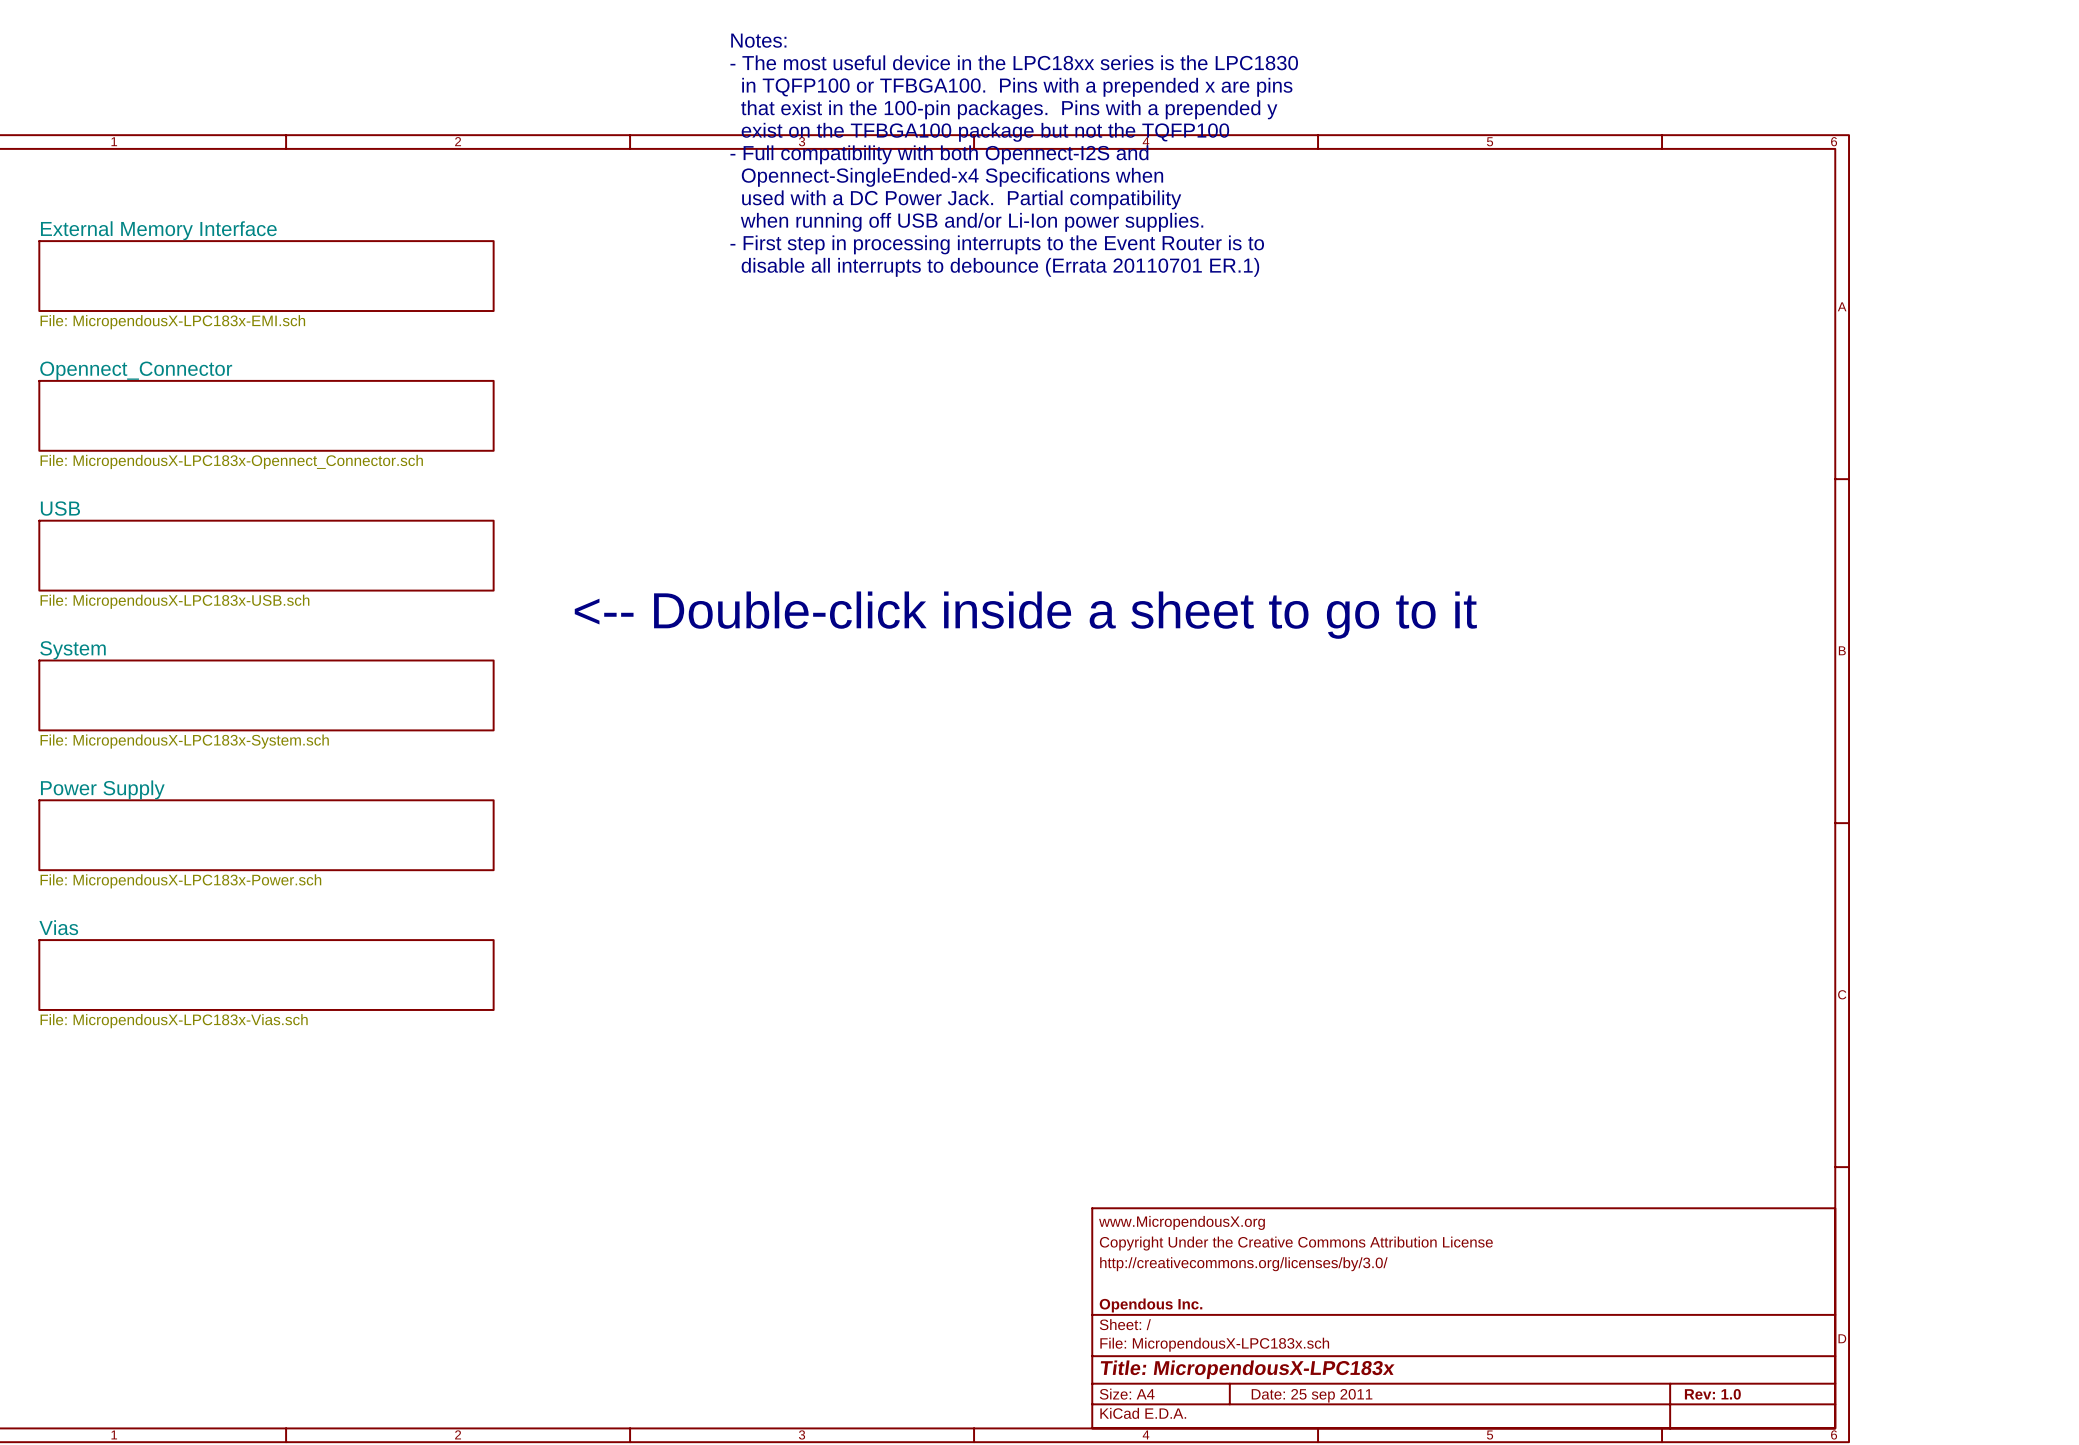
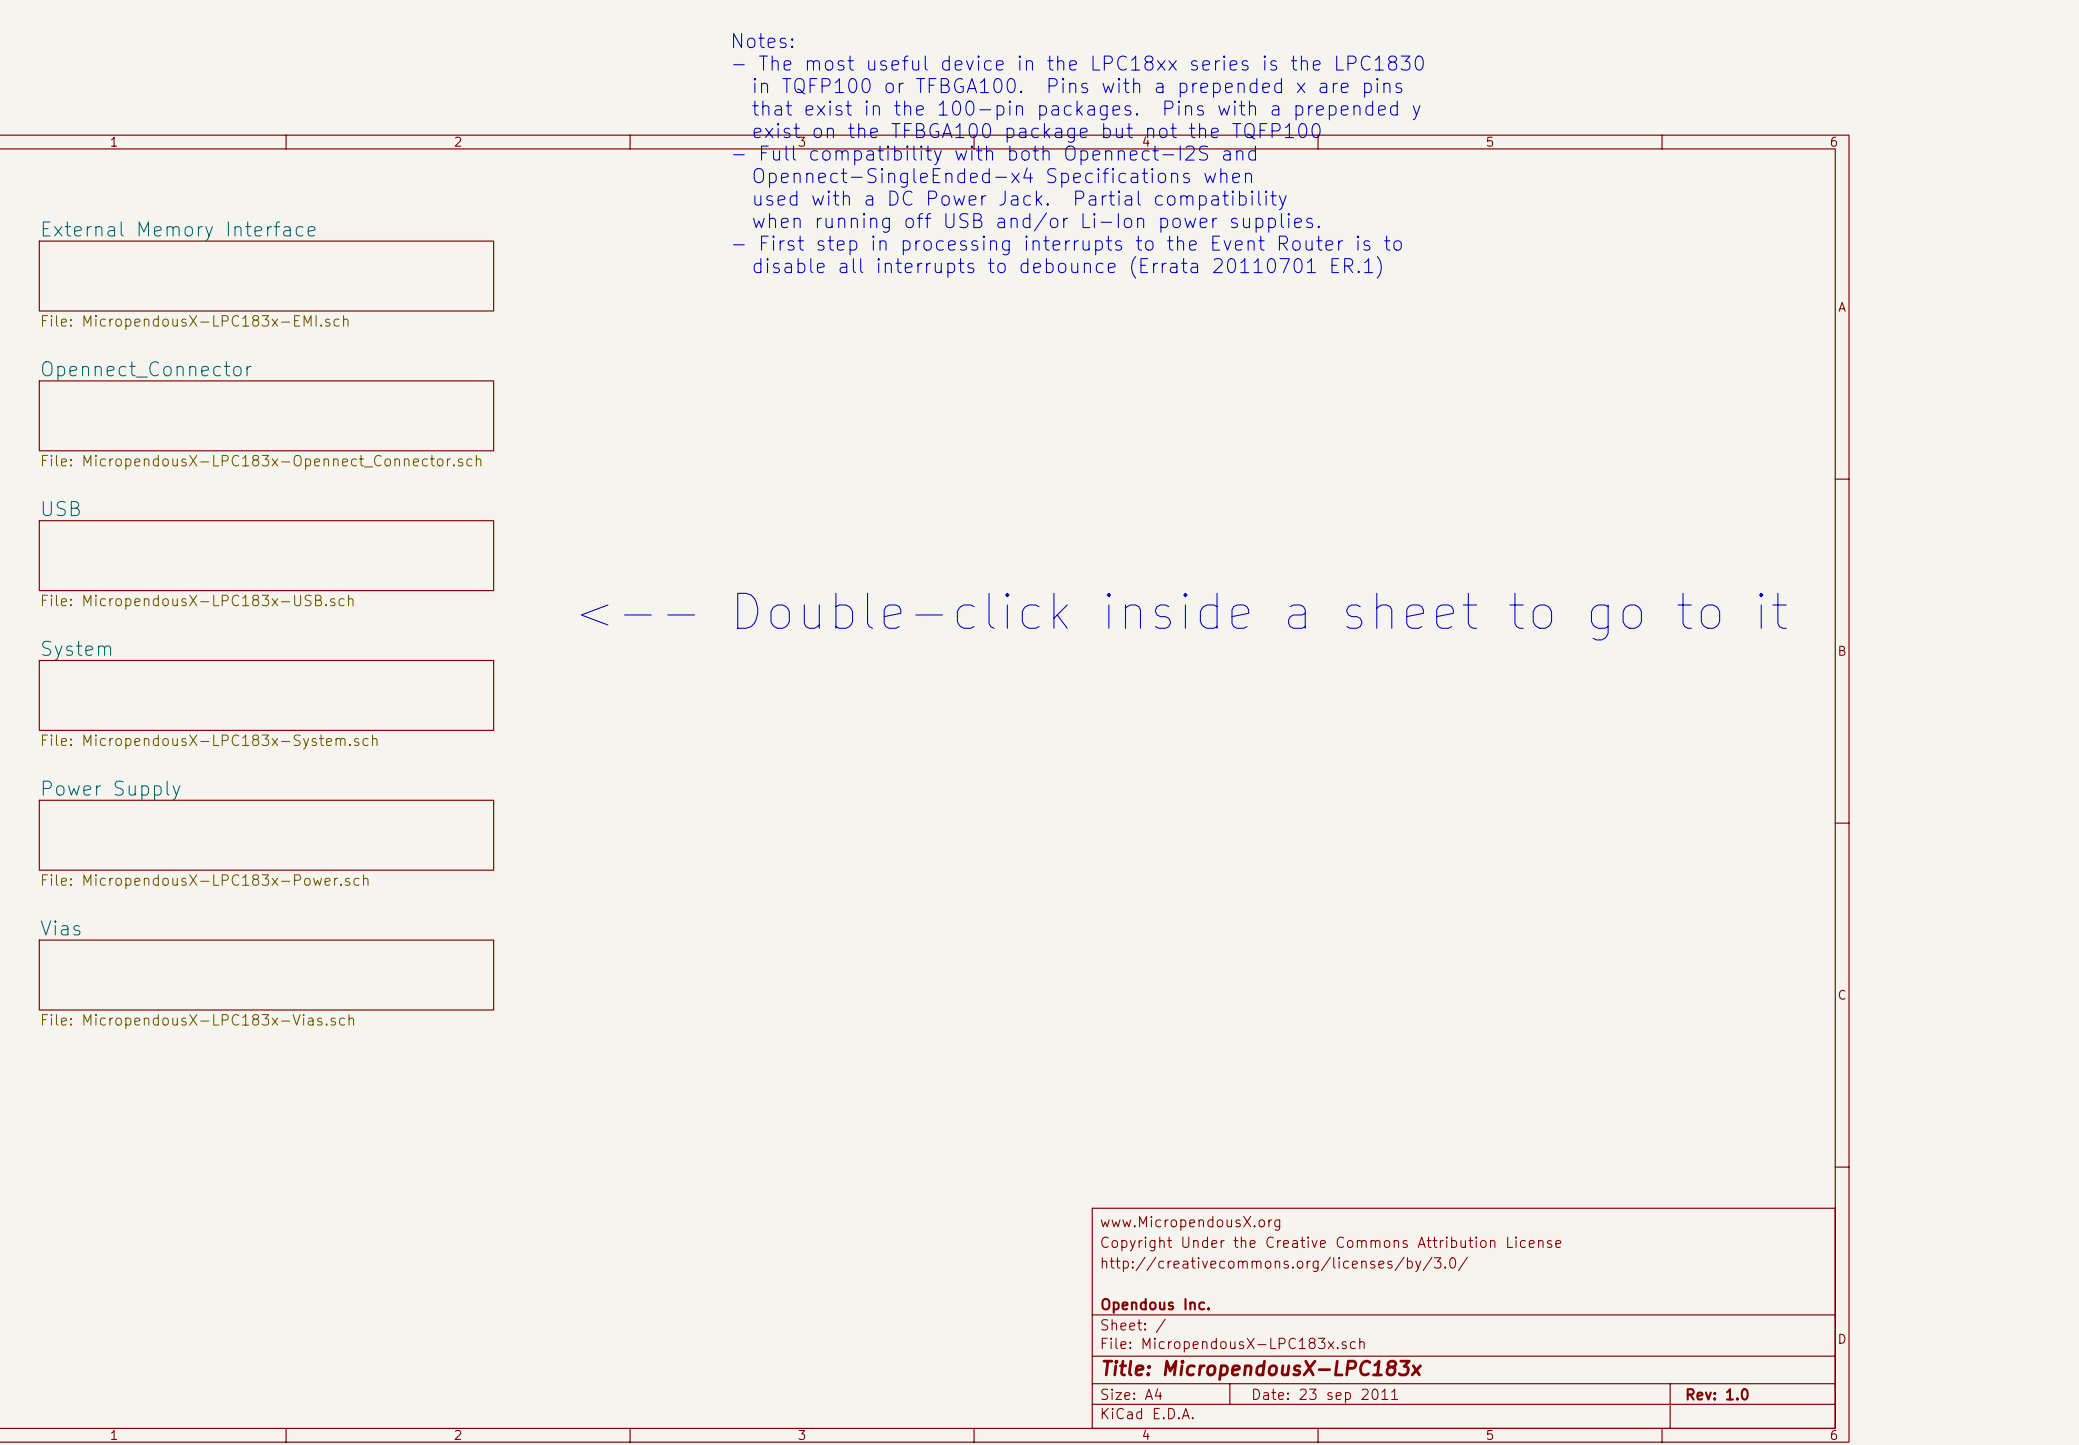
title block: Date: 25 sep 2011 (1312, 1395) -> Date: 23 sep 2011 (1325, 1396)

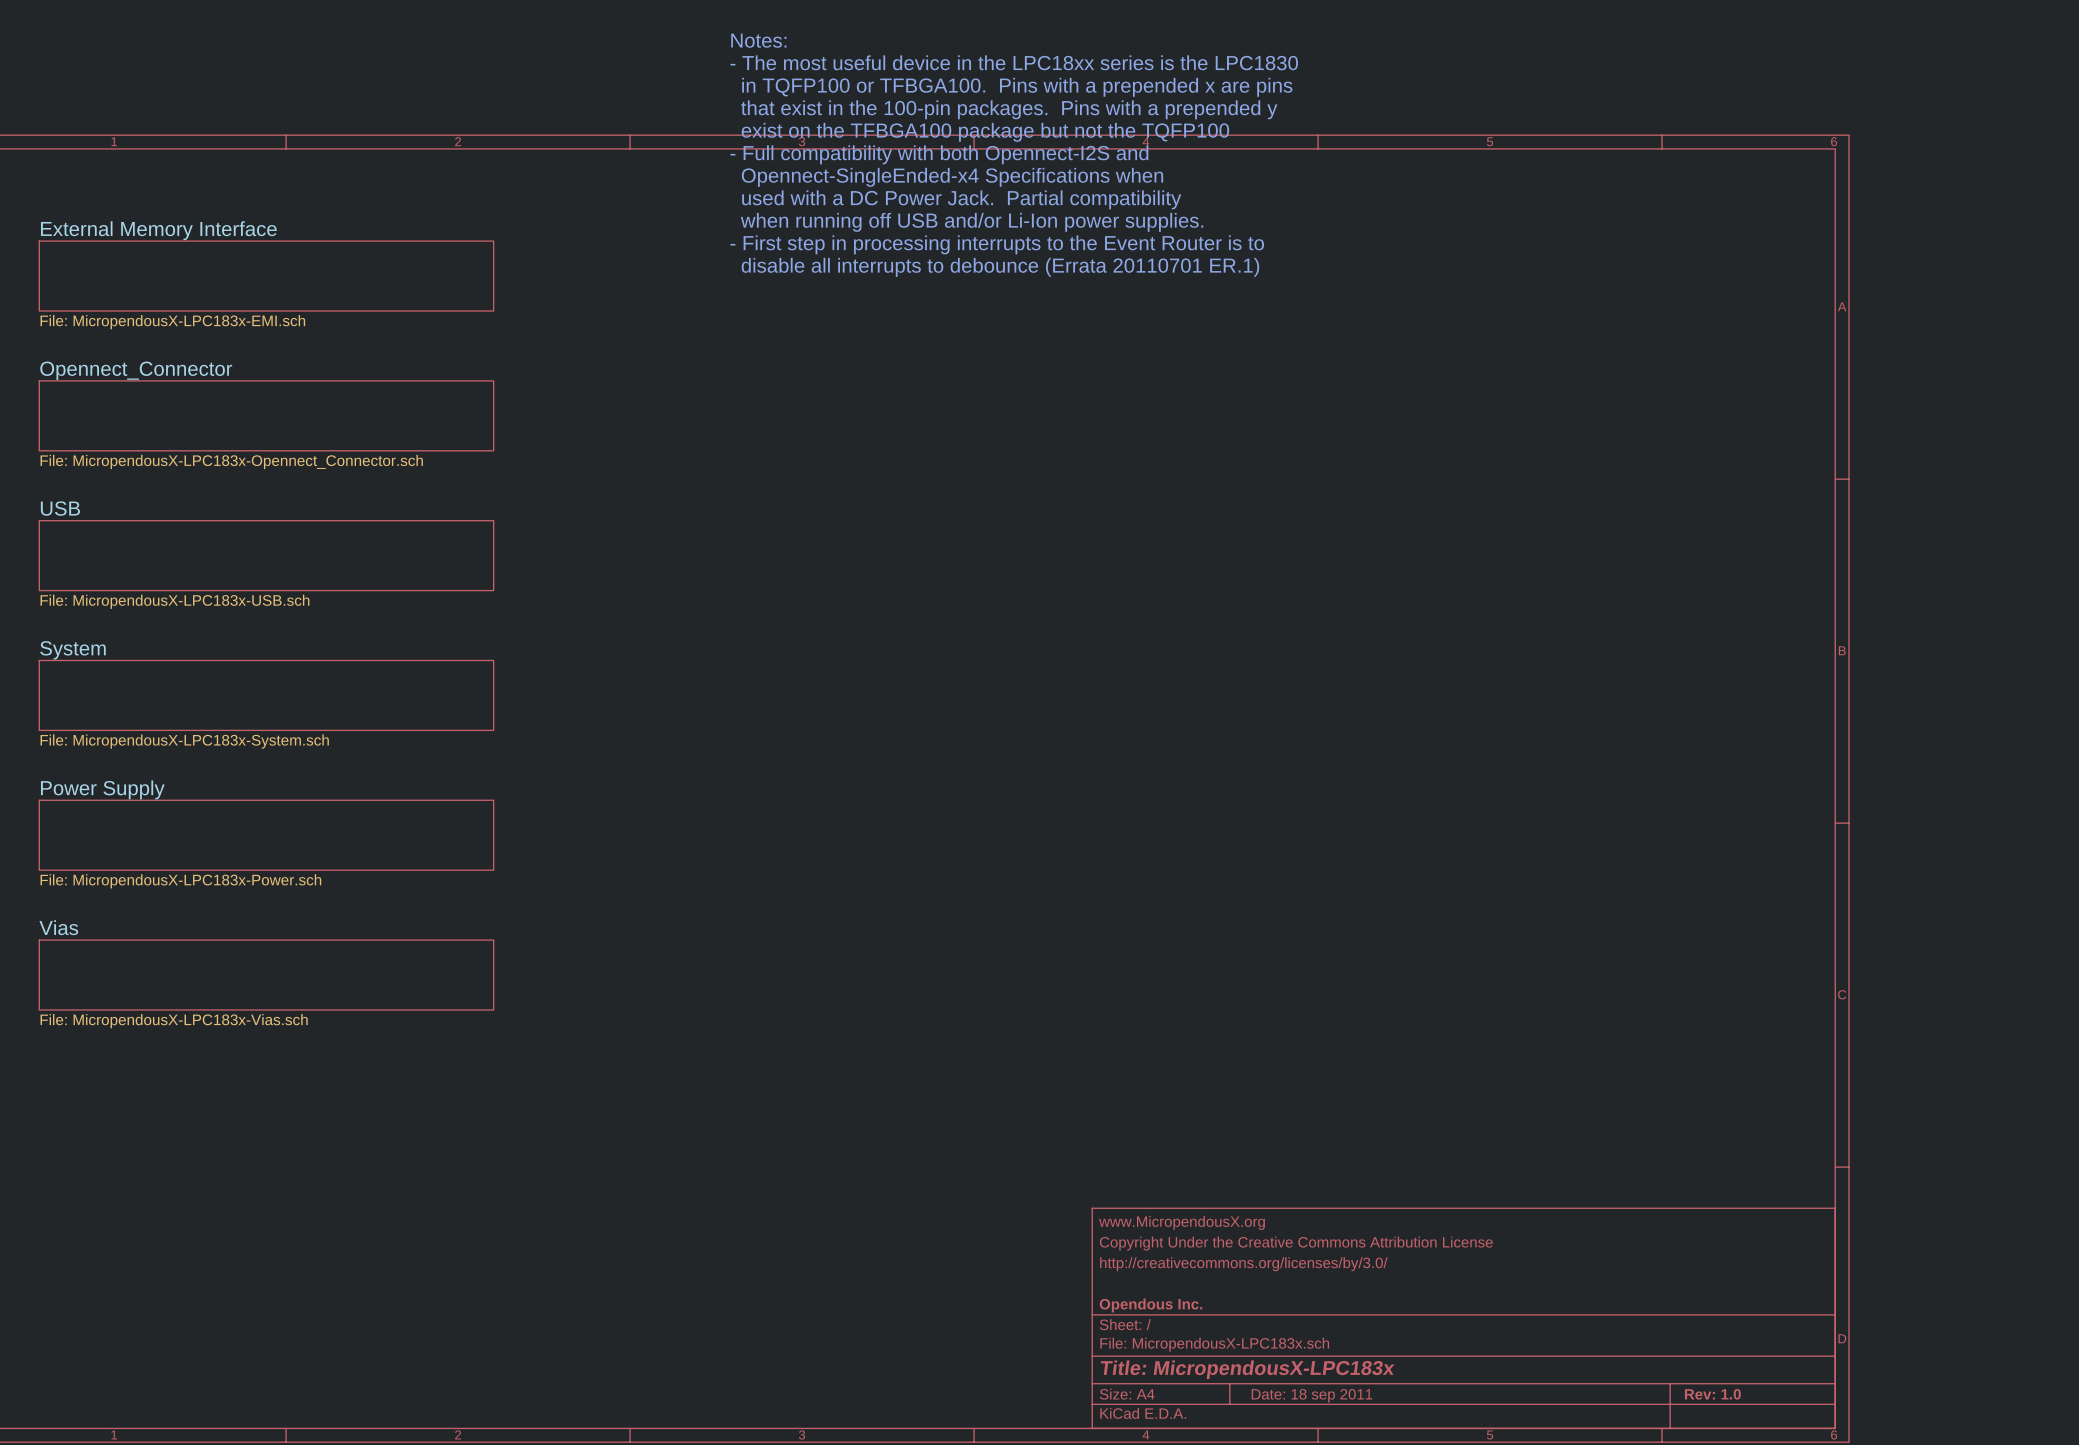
text: <-- Double-click inside a sheet to go to it (1183, 616) -> none
title block: Date: 23 sep 2011 (1325, 1396) -> Date: 18 sep 2011 (1312, 1395)

